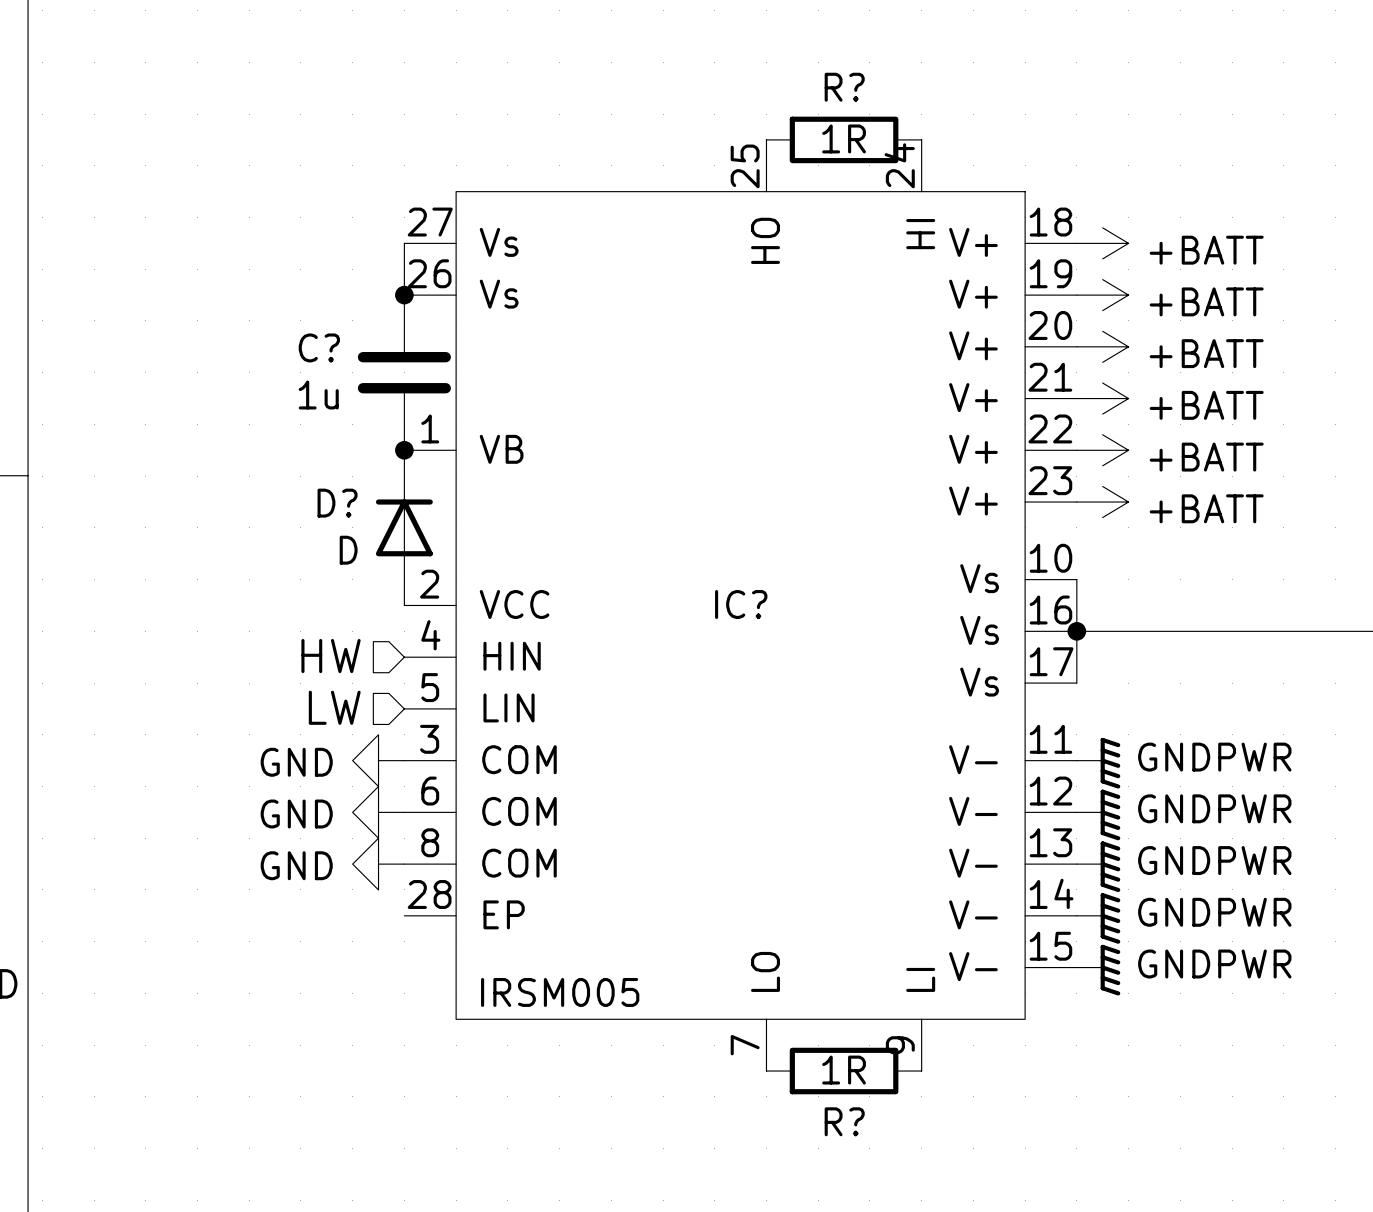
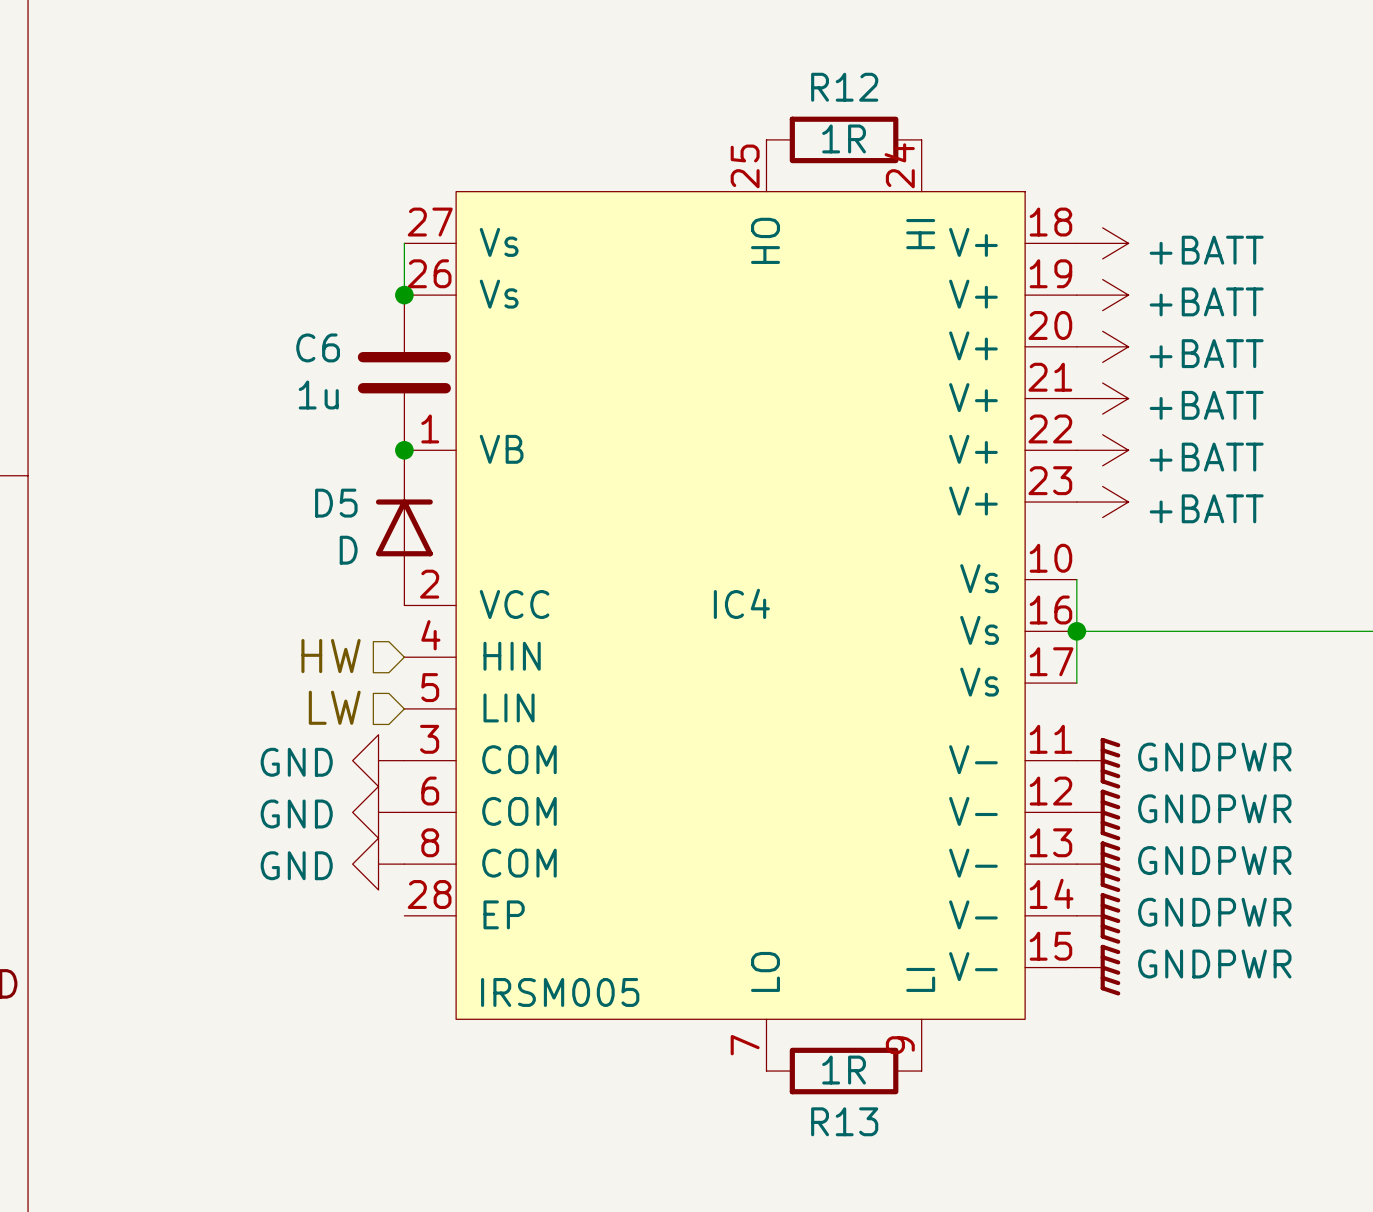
R? name: R? (844, 87) -> R12 (844, 87)
C? name: C? (319, 347) -> C6 (318, 347)
D? name: D? (337, 503) -> D5 (336, 503)
IC? name: IC? (741, 604) -> IC4 (741, 603)
R? name: R? (844, 1121) -> R13 (844, 1121)

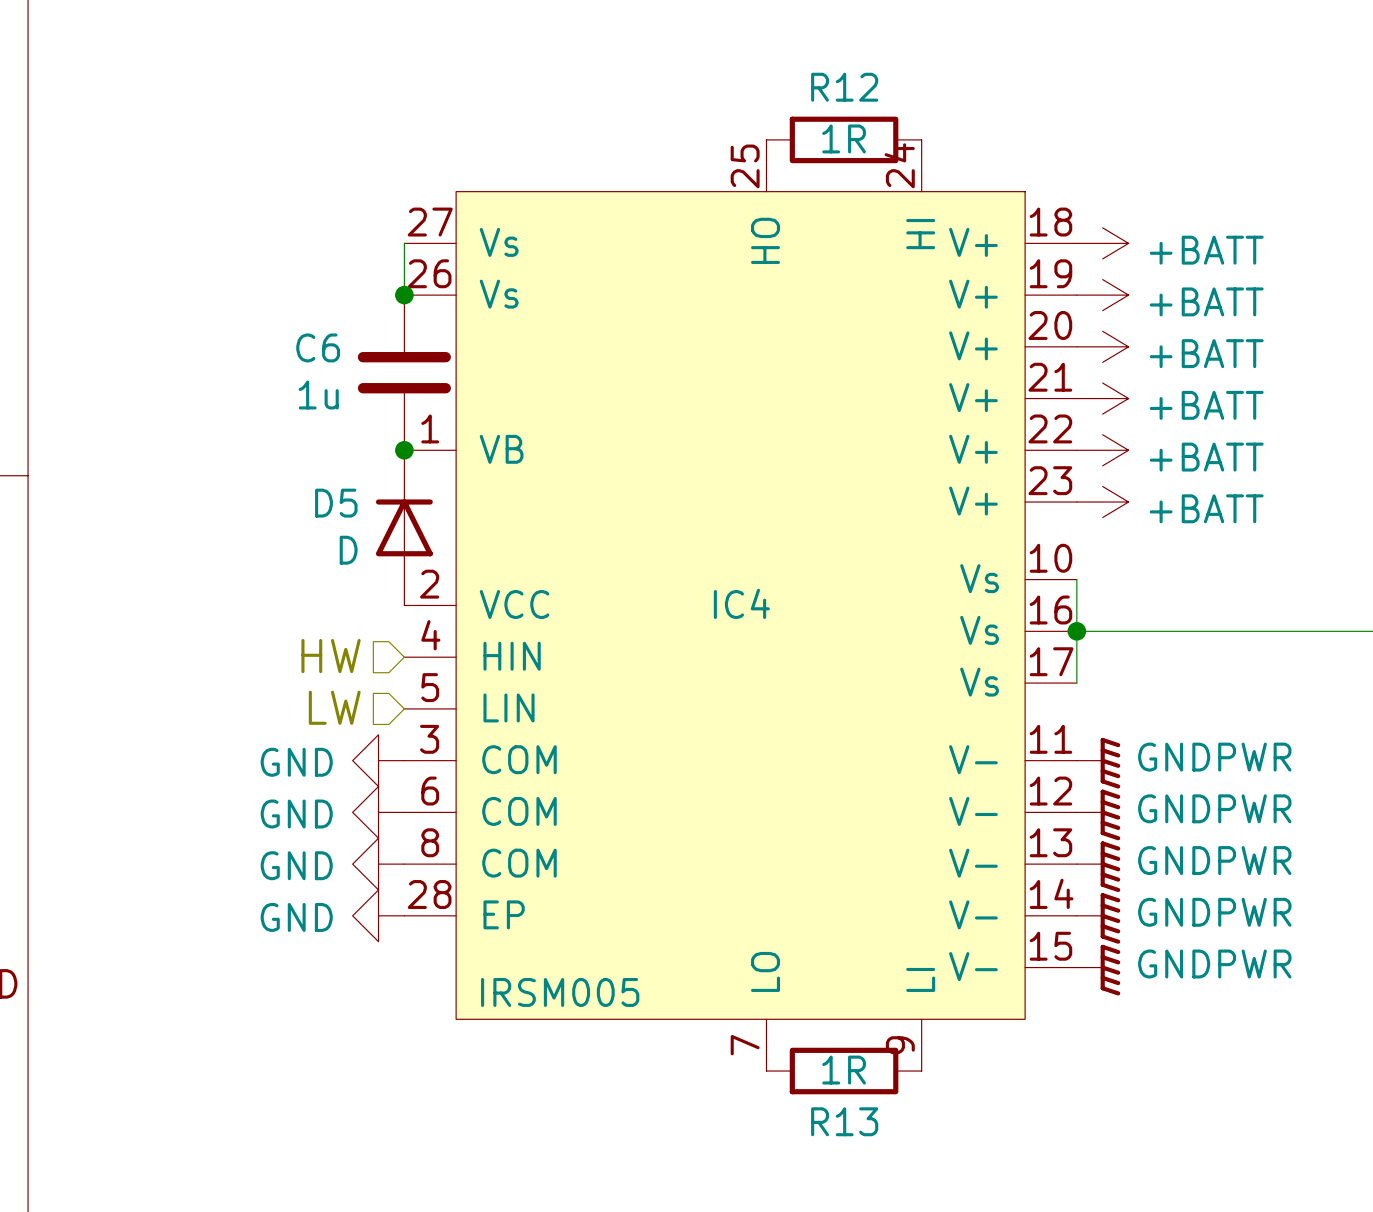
power symbol: none -> GND (378, 915)

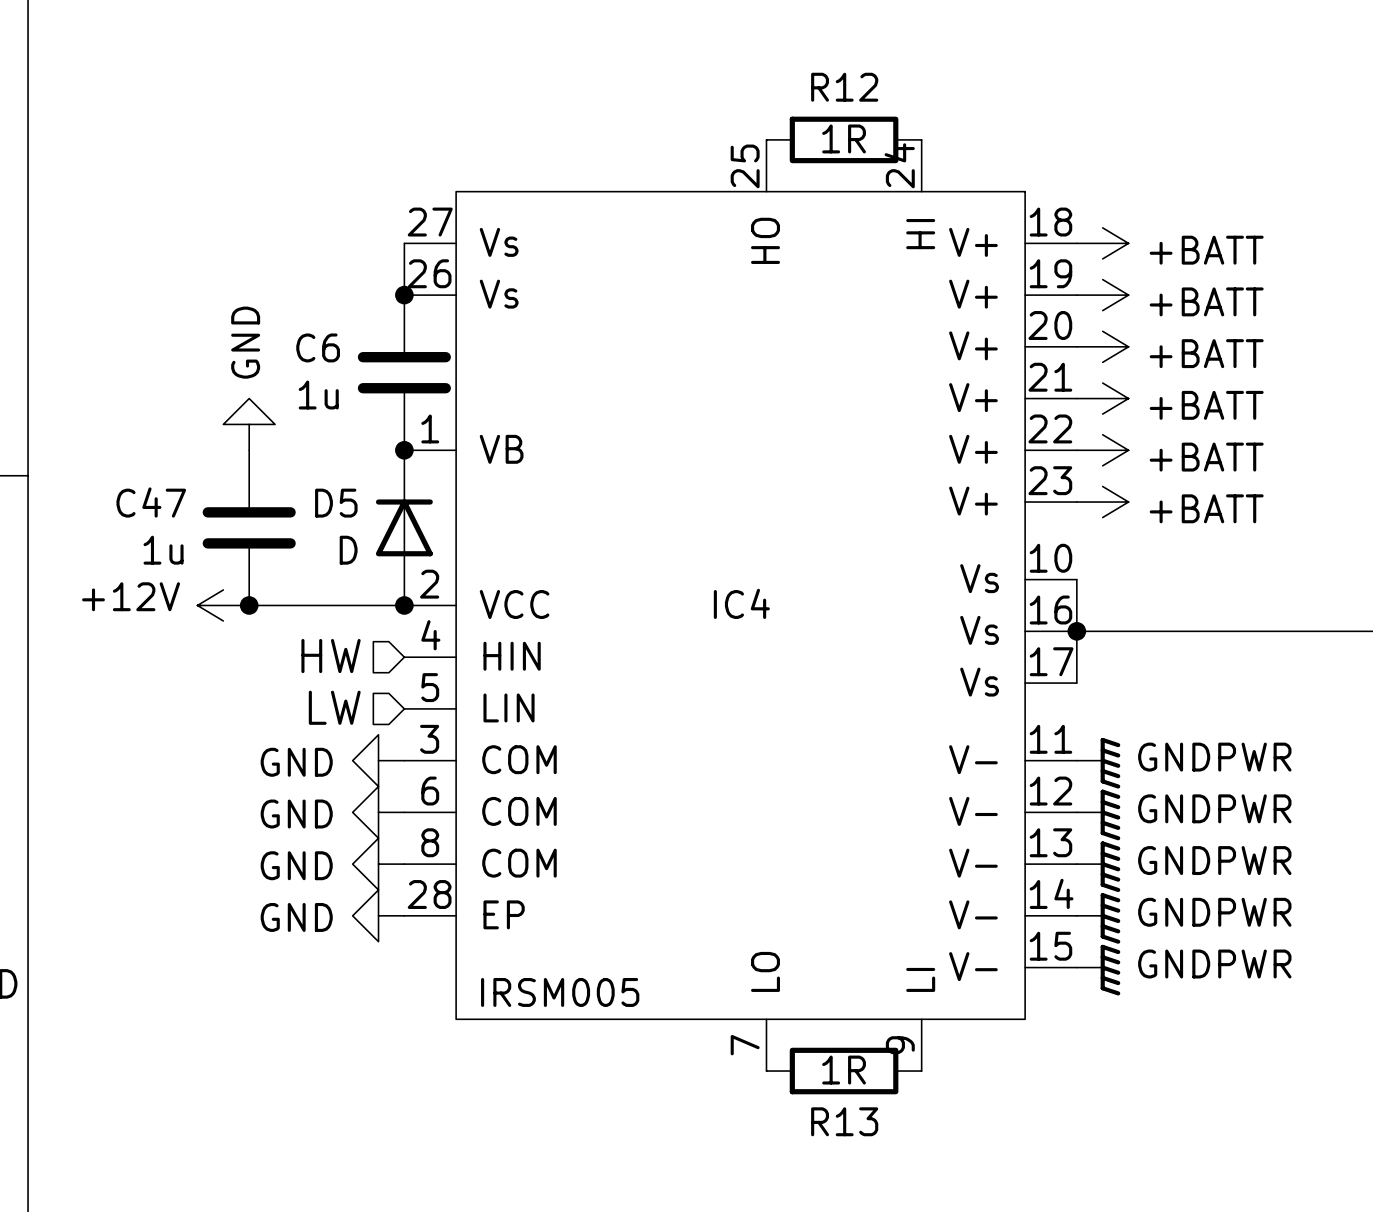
power symbol: none -> GND (249, 424)
C47: none -> 1u (249, 527)
power symbol: none -> +12V (223, 605)
wire: none -> (249, 605) (404, 605)
junction: none -> (249, 605)
junction: none -> (404, 605)

